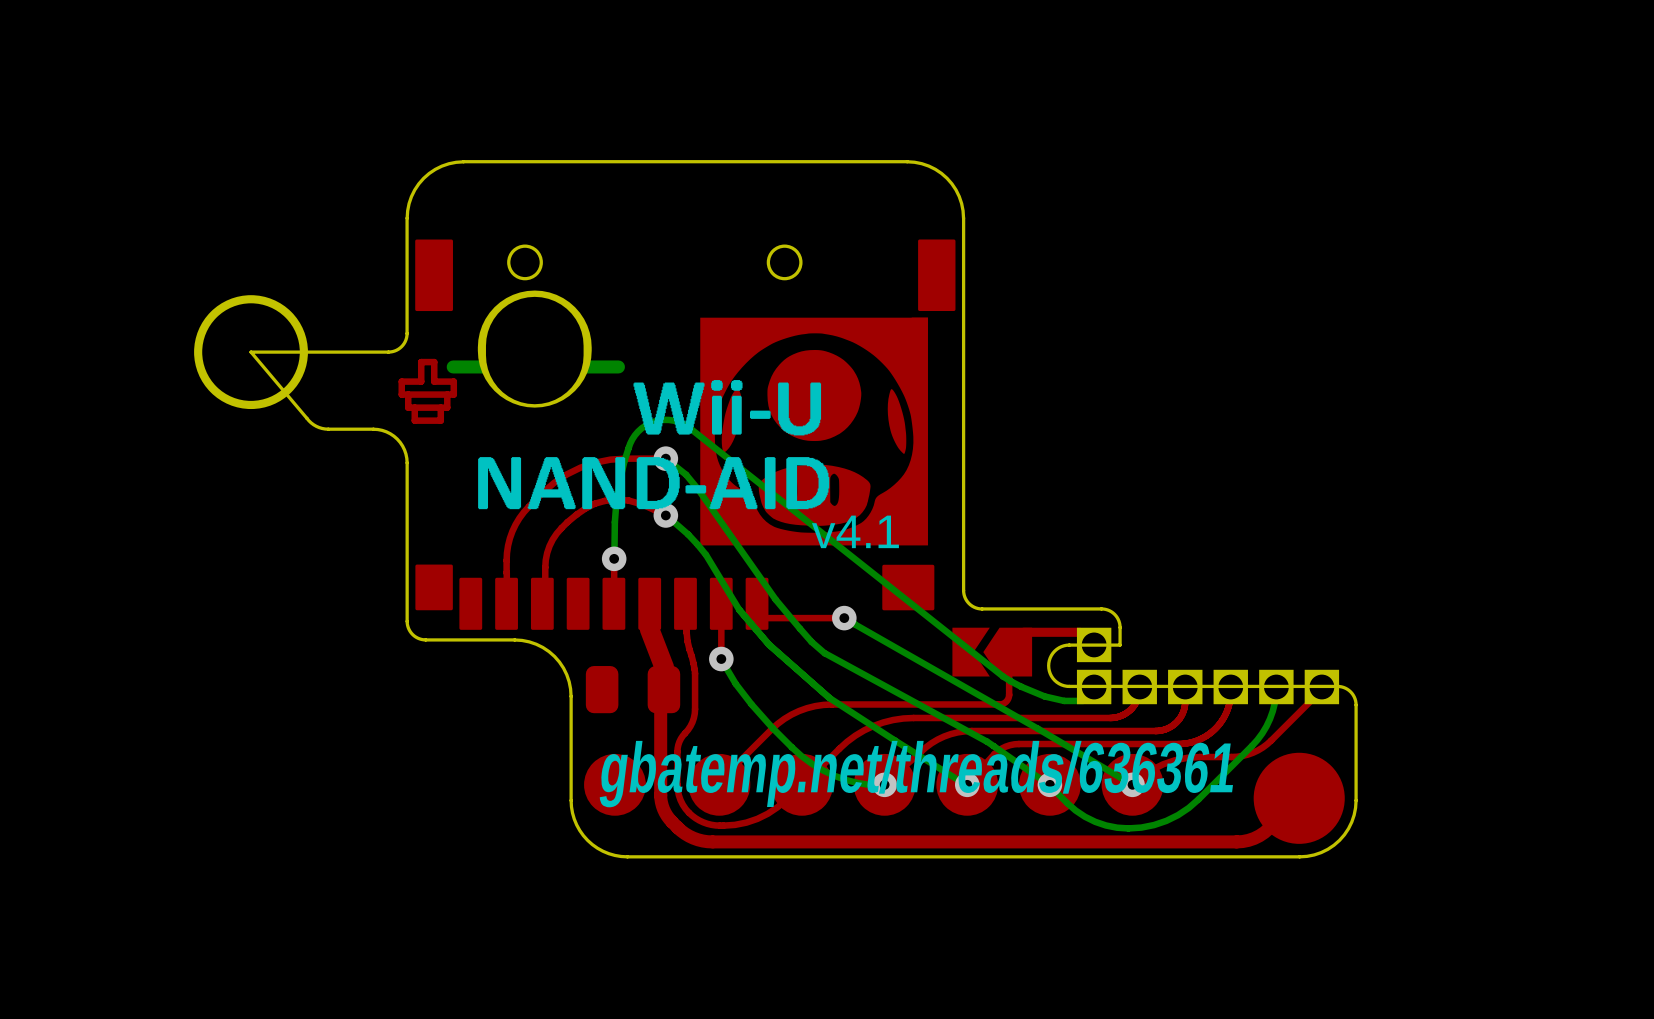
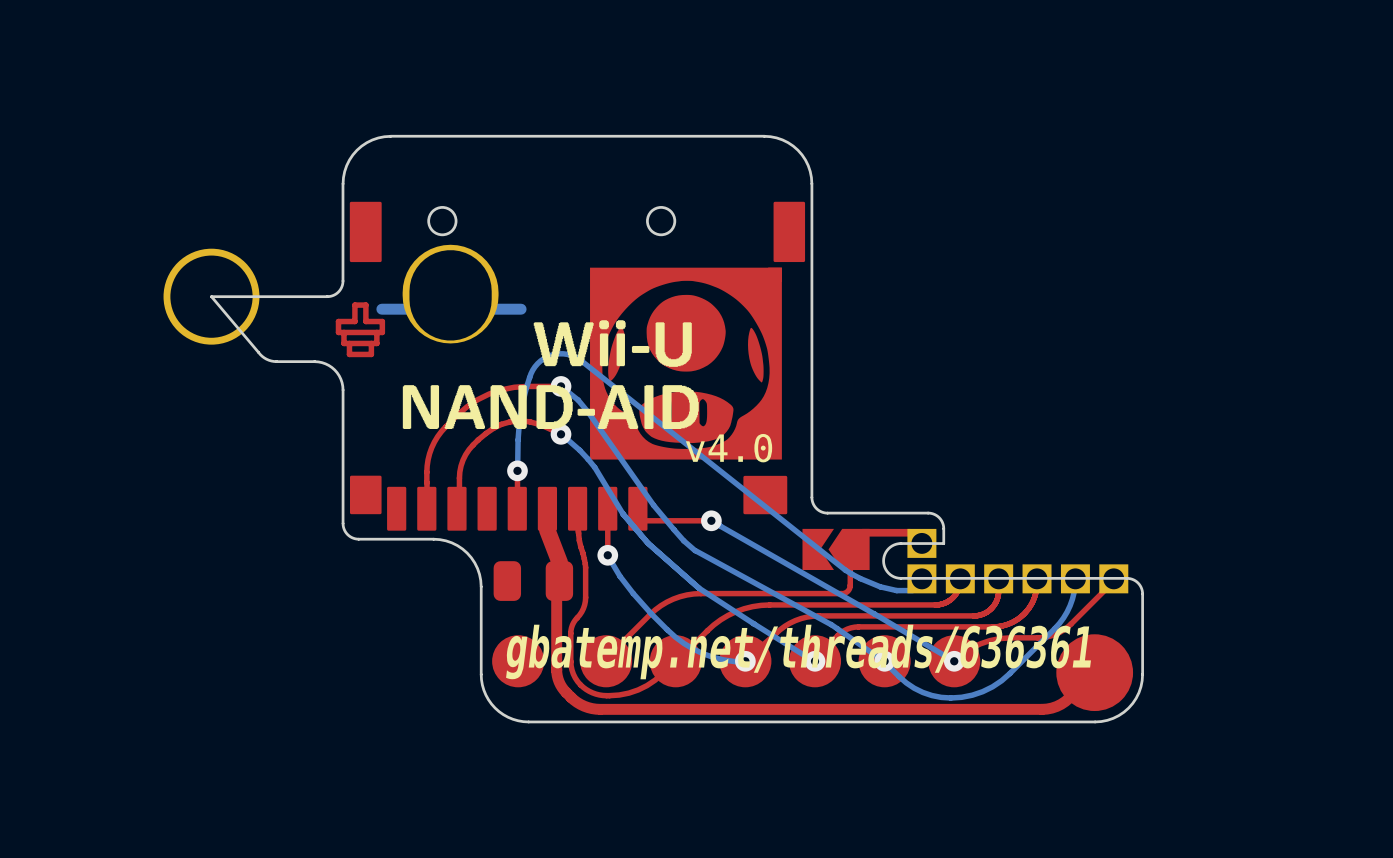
text: v4.1 (855, 531) -> v4.0 (729, 448)

